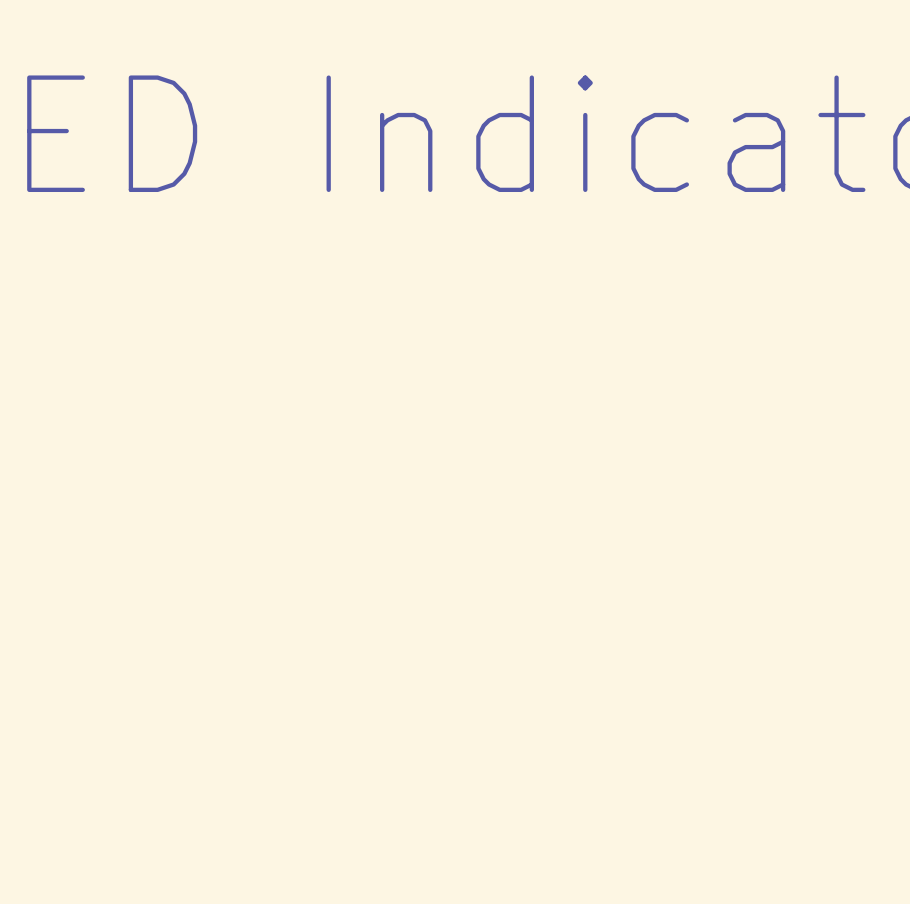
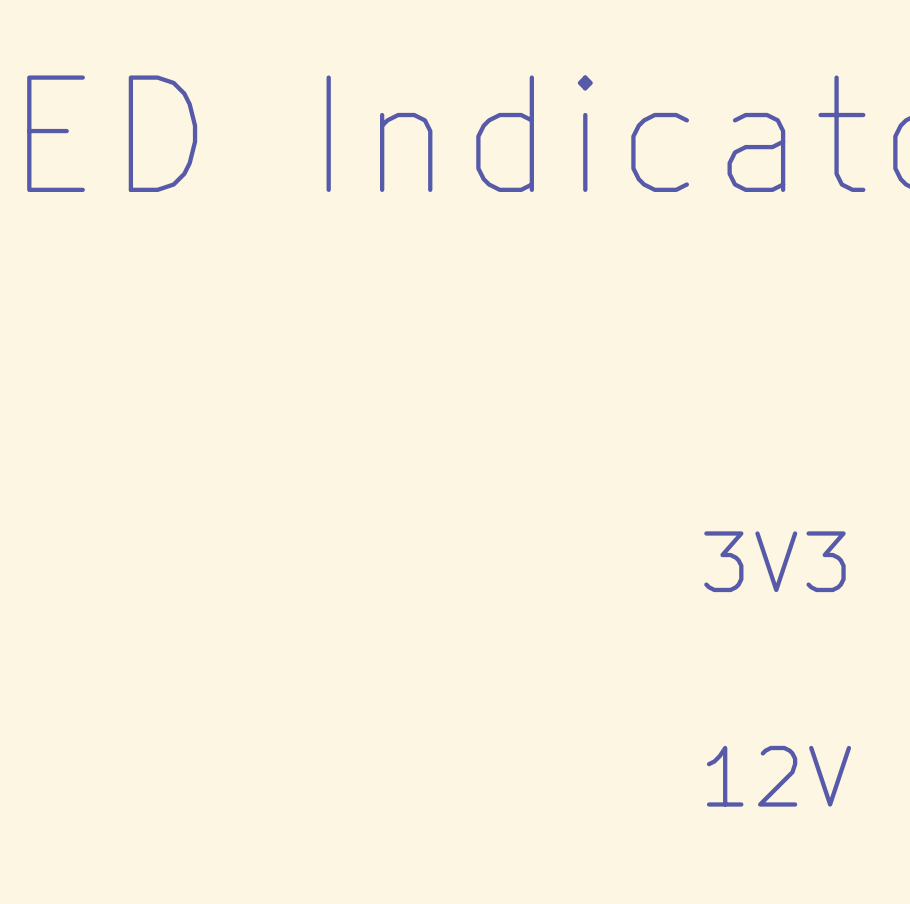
text: none -> 3V3 (774, 561)
text: none -> 12V (778, 776)

